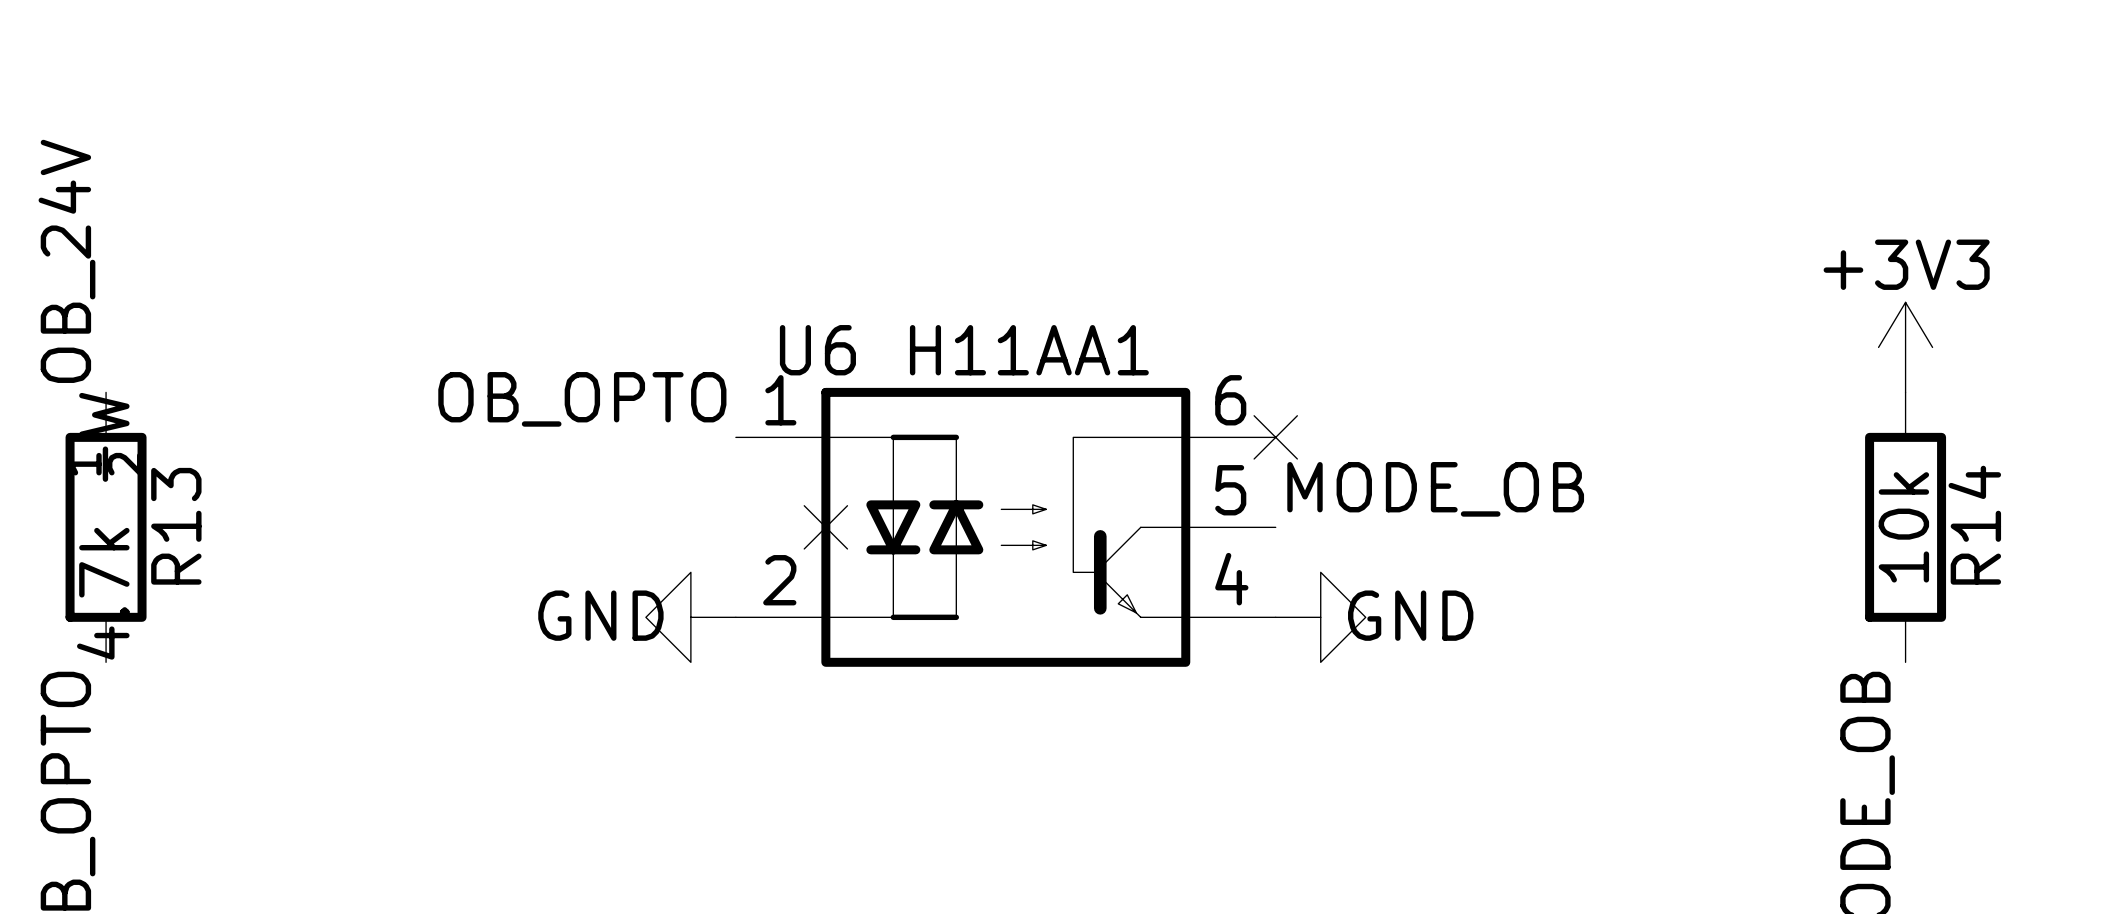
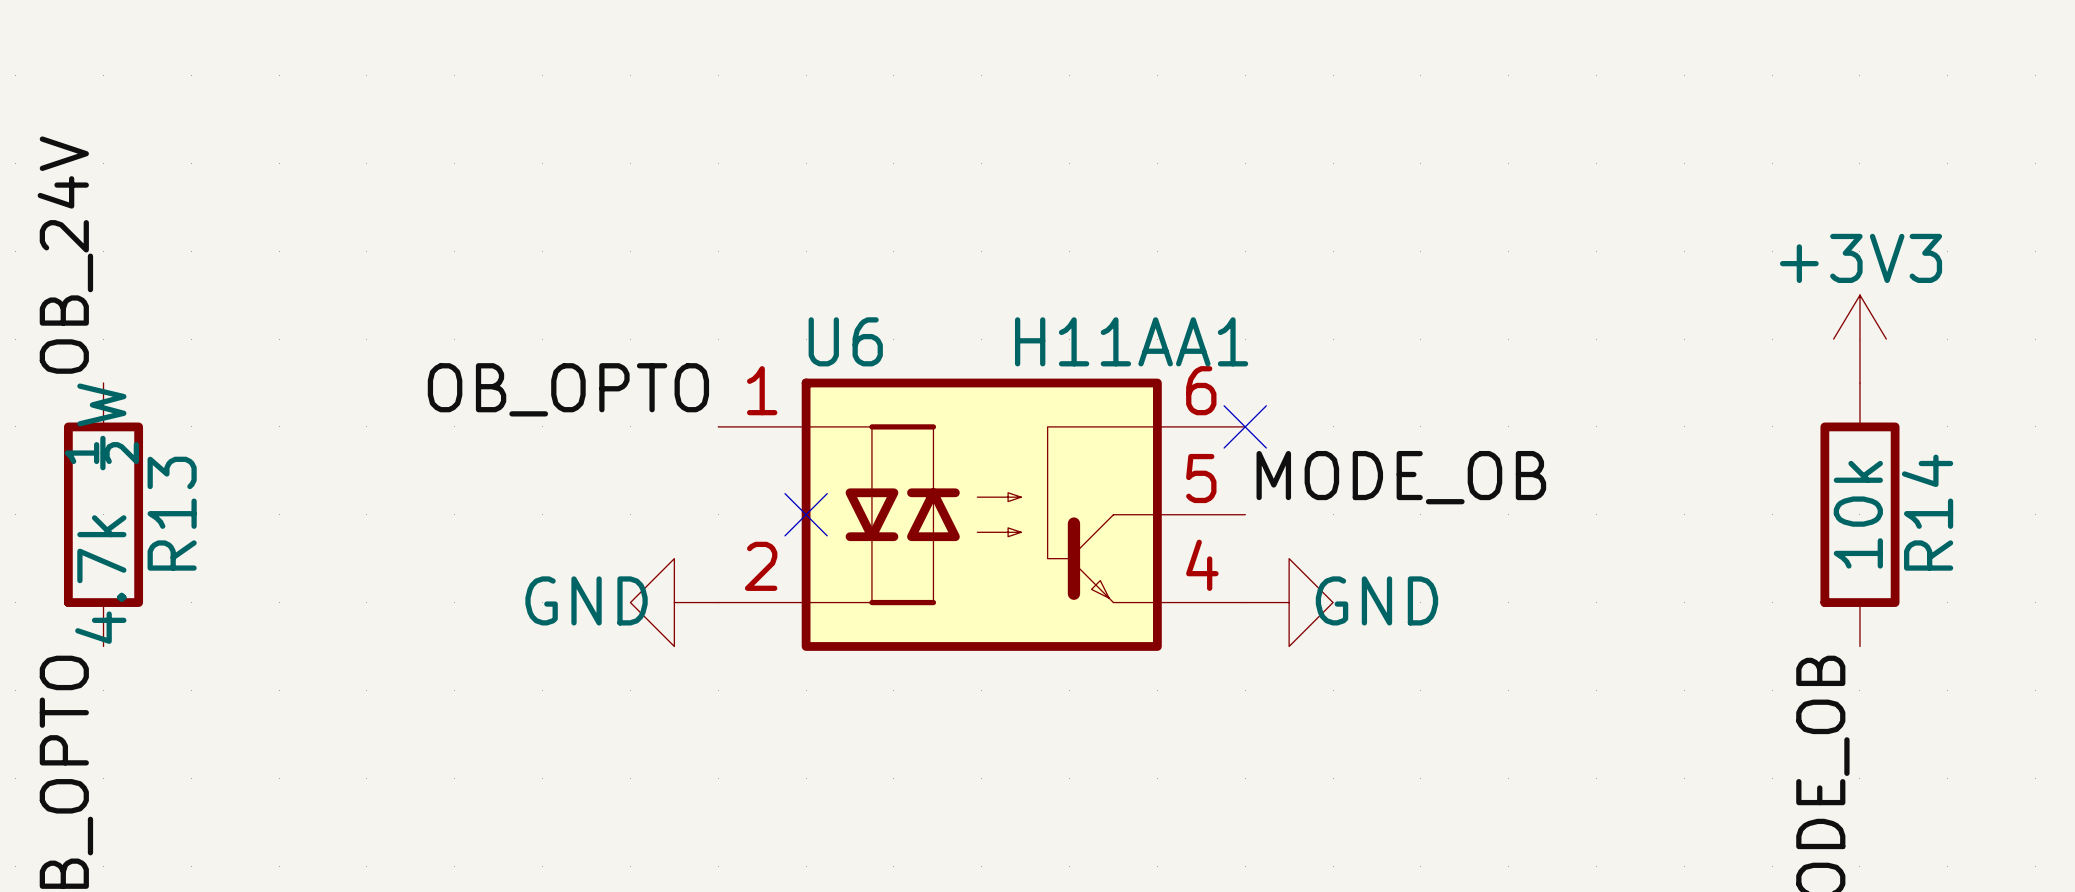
U6 name position: U6 (817, 350) -> U6 (845, 341)
U6 value position: H11AA1 (1029, 350) -> H11AA1 (1131, 341)

